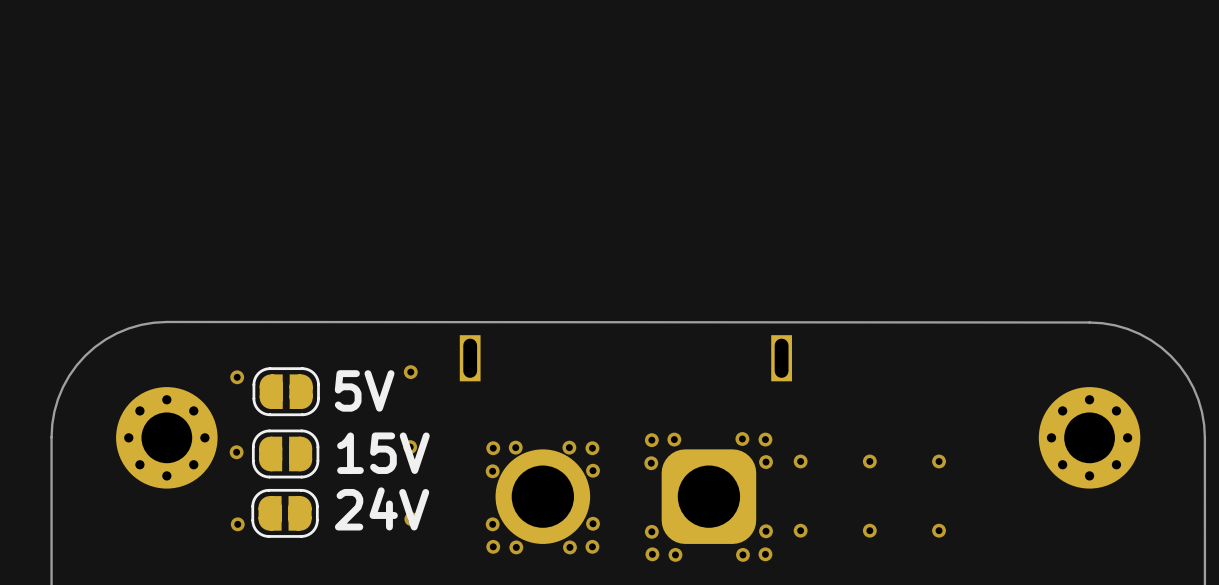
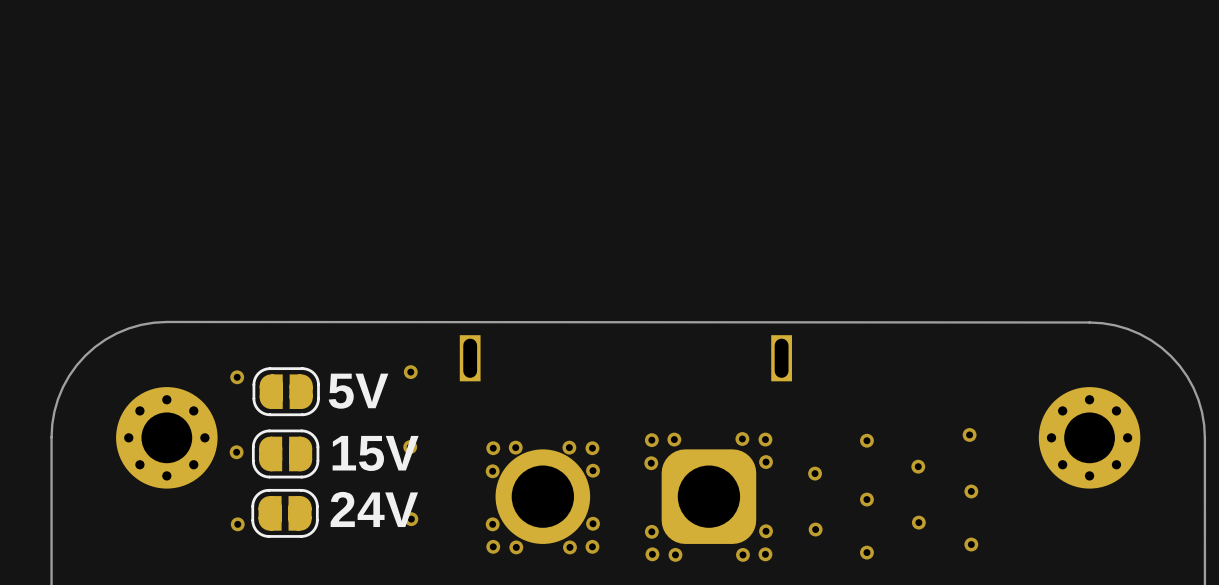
via: none -> (969, 434)
via: none -> (866, 440)
via position: (800, 461) -> (815, 473)
via: (869, 461) -> none
via: (939, 461) -> none
via: none -> (918, 466)
via: none -> (971, 491)
via: none -> (866, 499)
via: none -> (918, 522)
via position: (800, 530) -> (815, 529)
via: (869, 530) -> none
via: (939, 530) -> none
via: none -> (971, 544)
via: none -> (866, 552)

